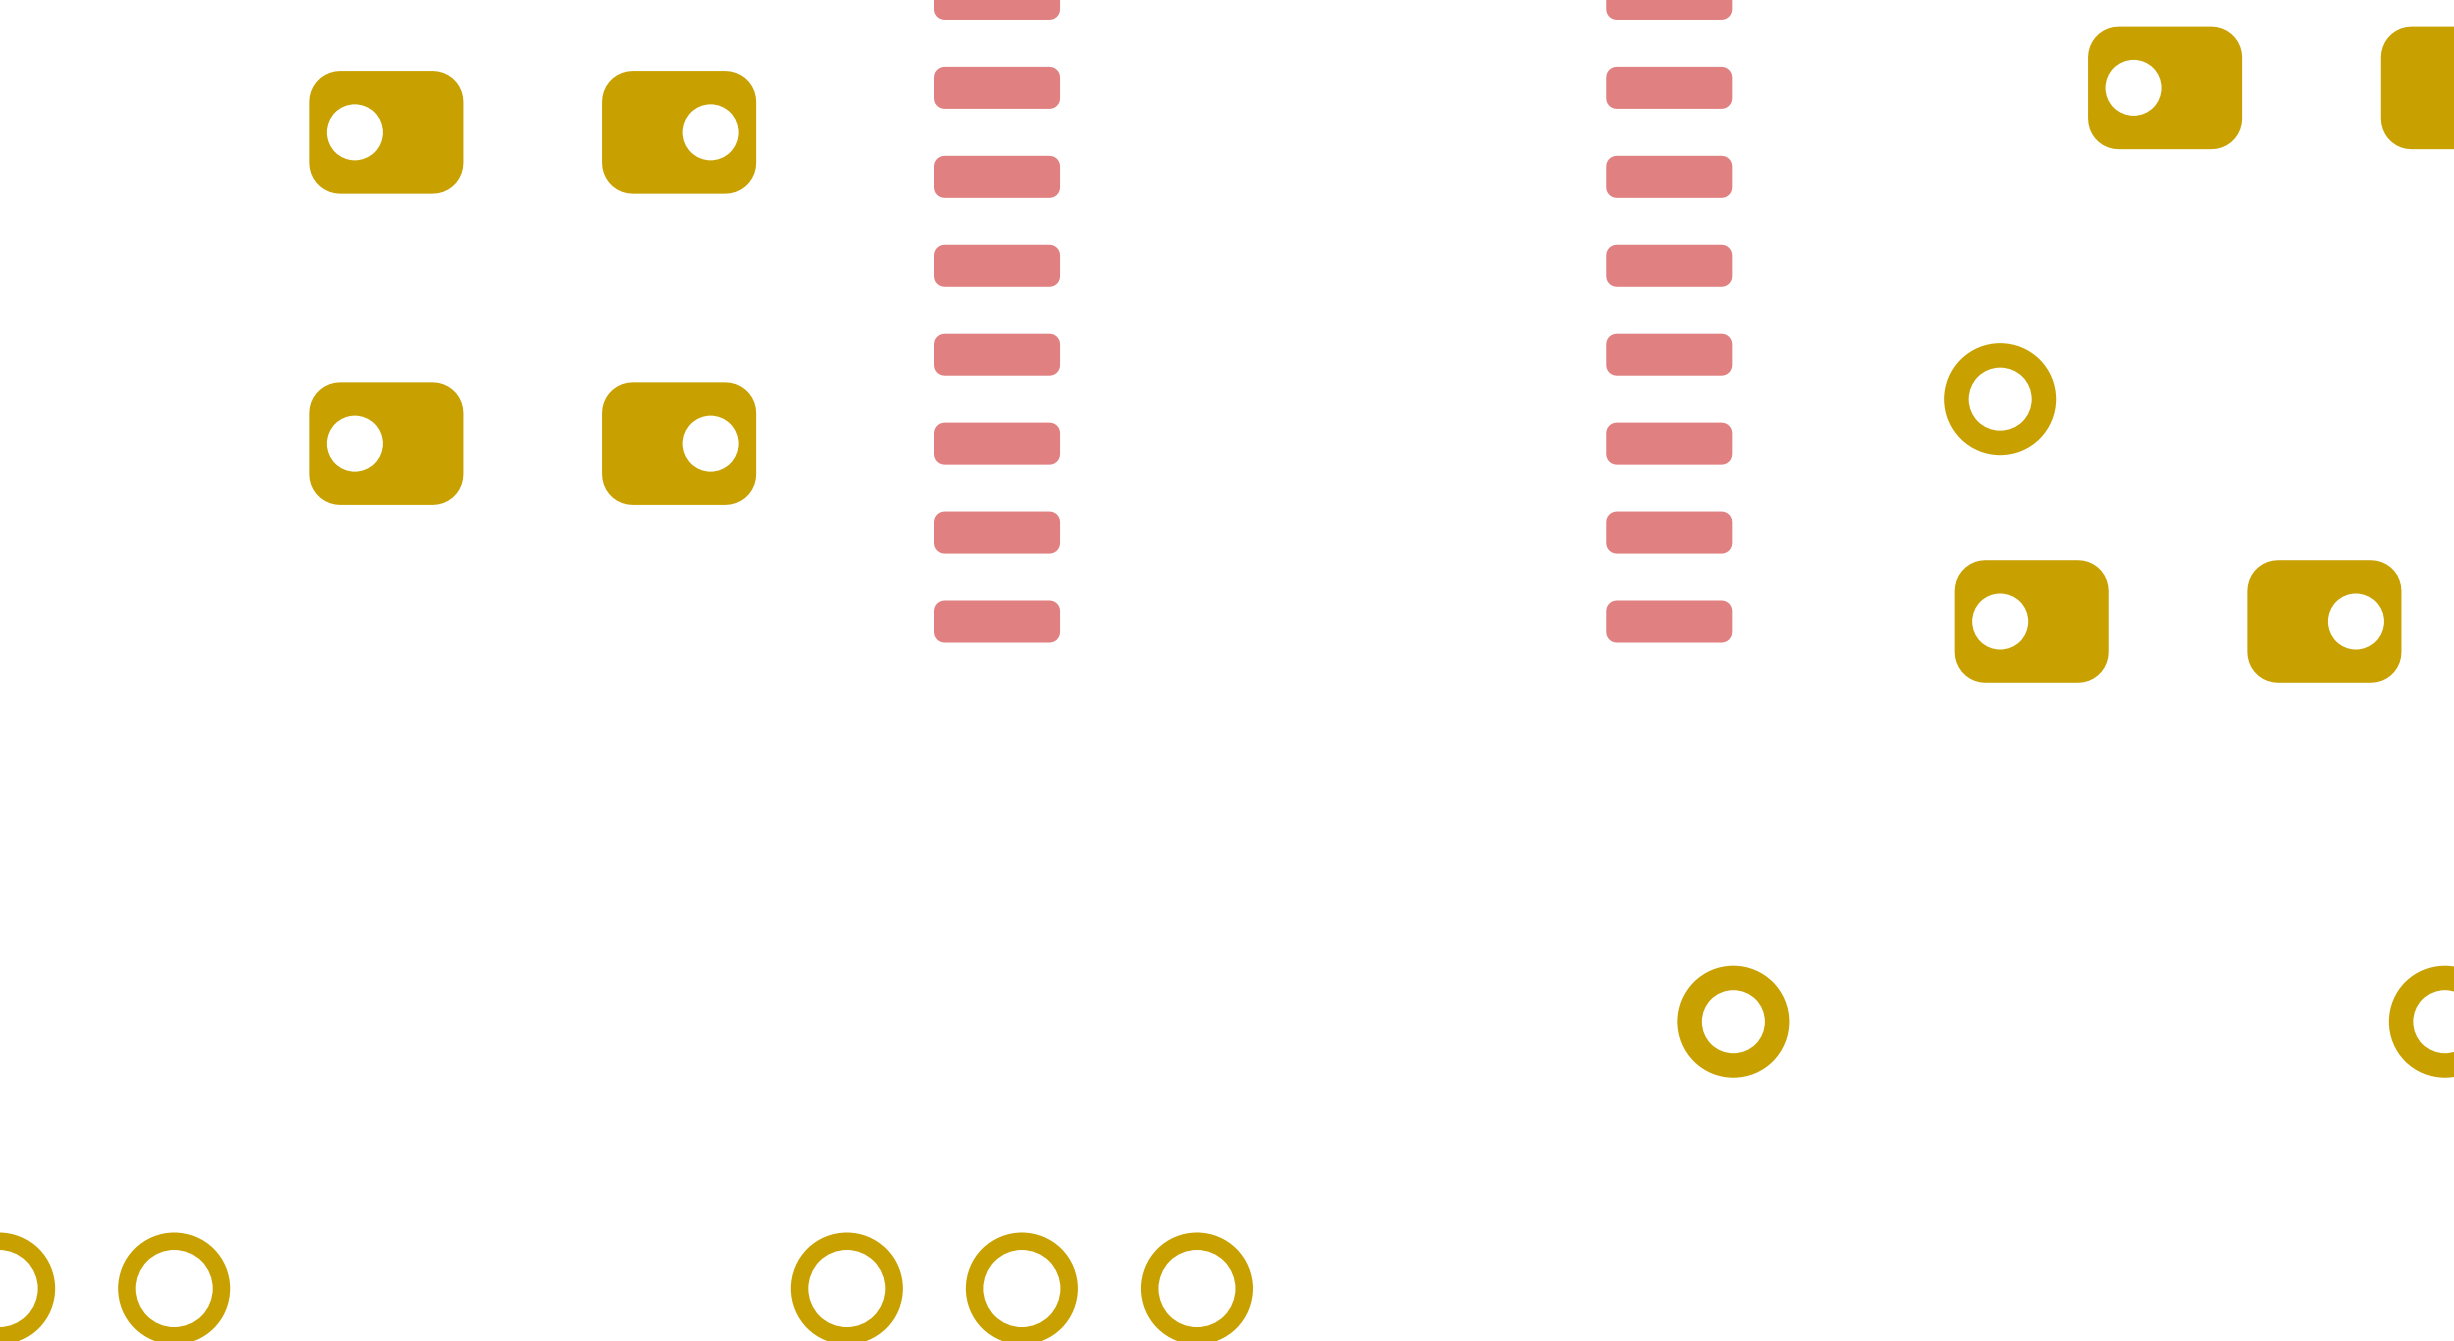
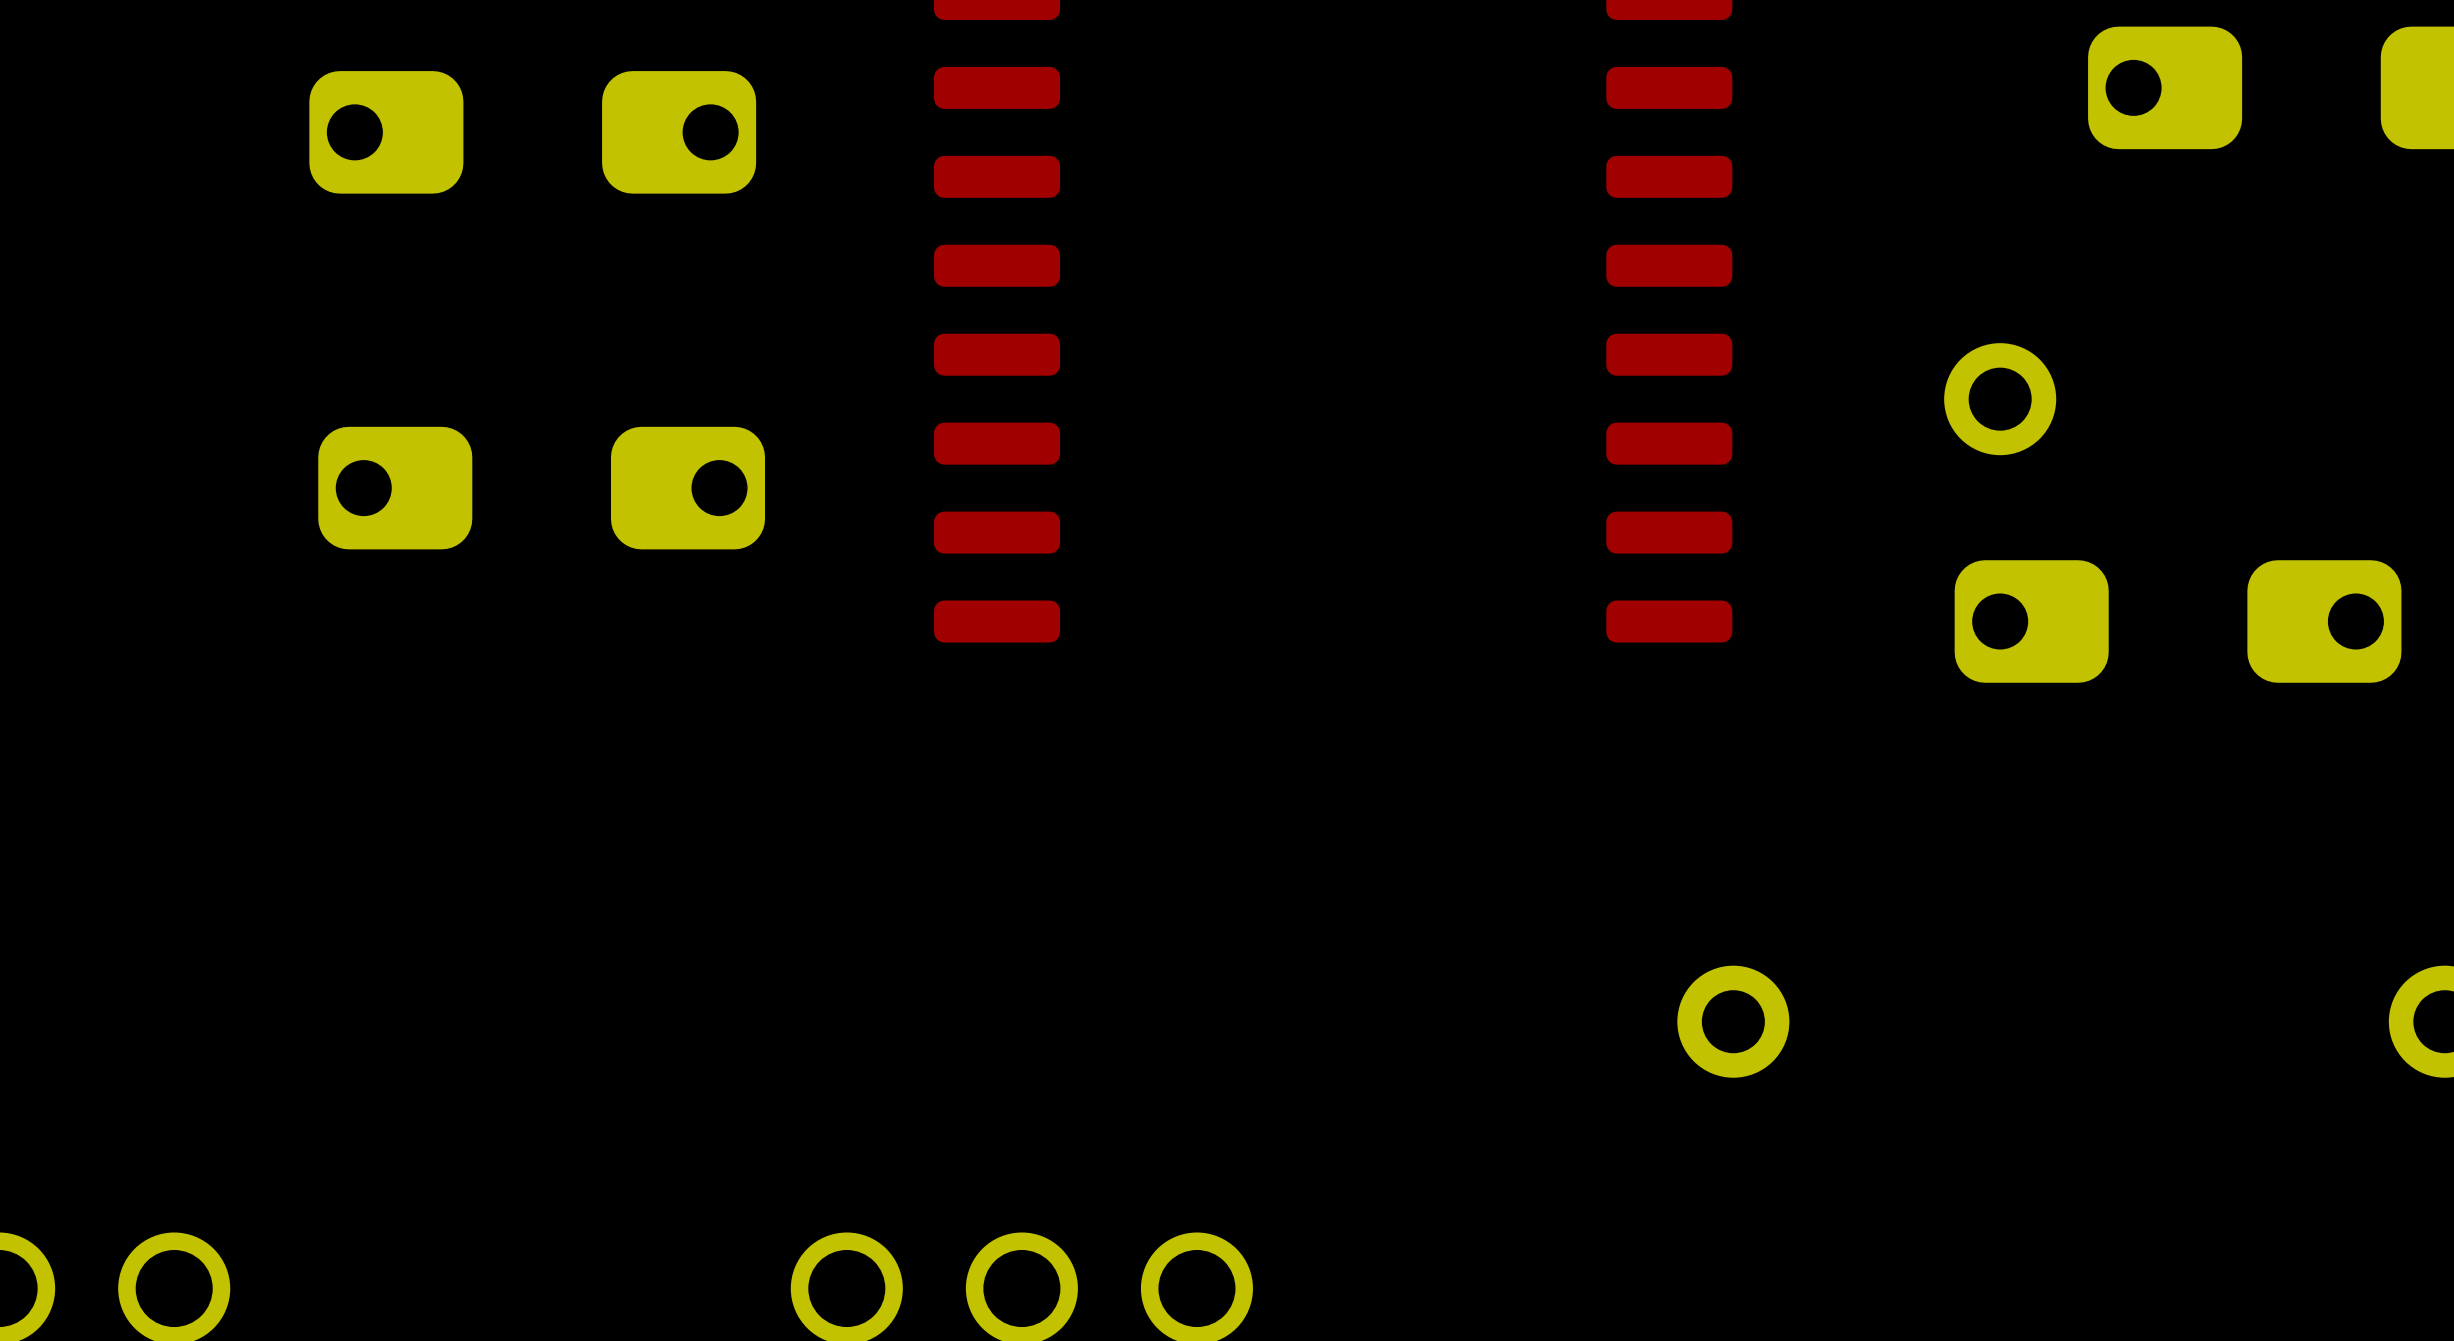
part position: (532, 443) -> (541, 488)

